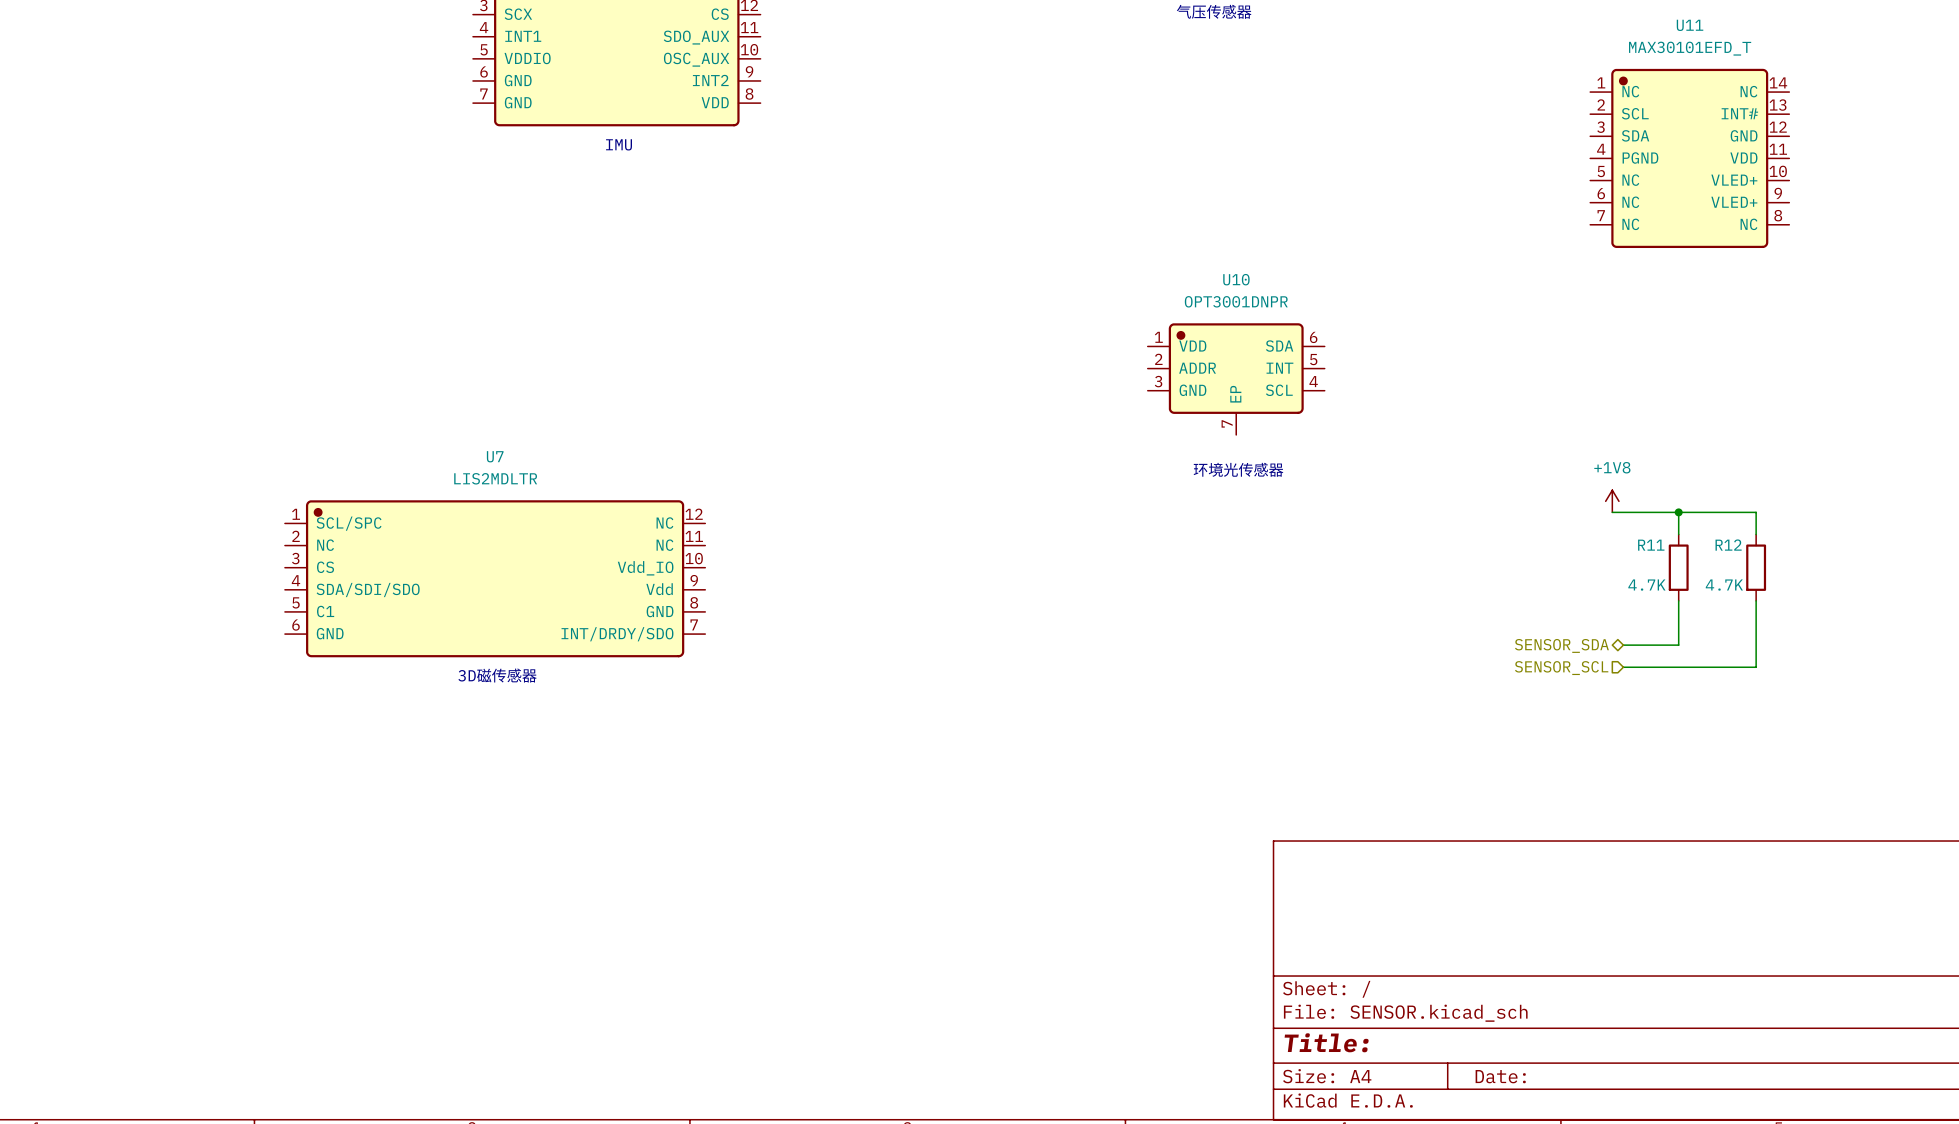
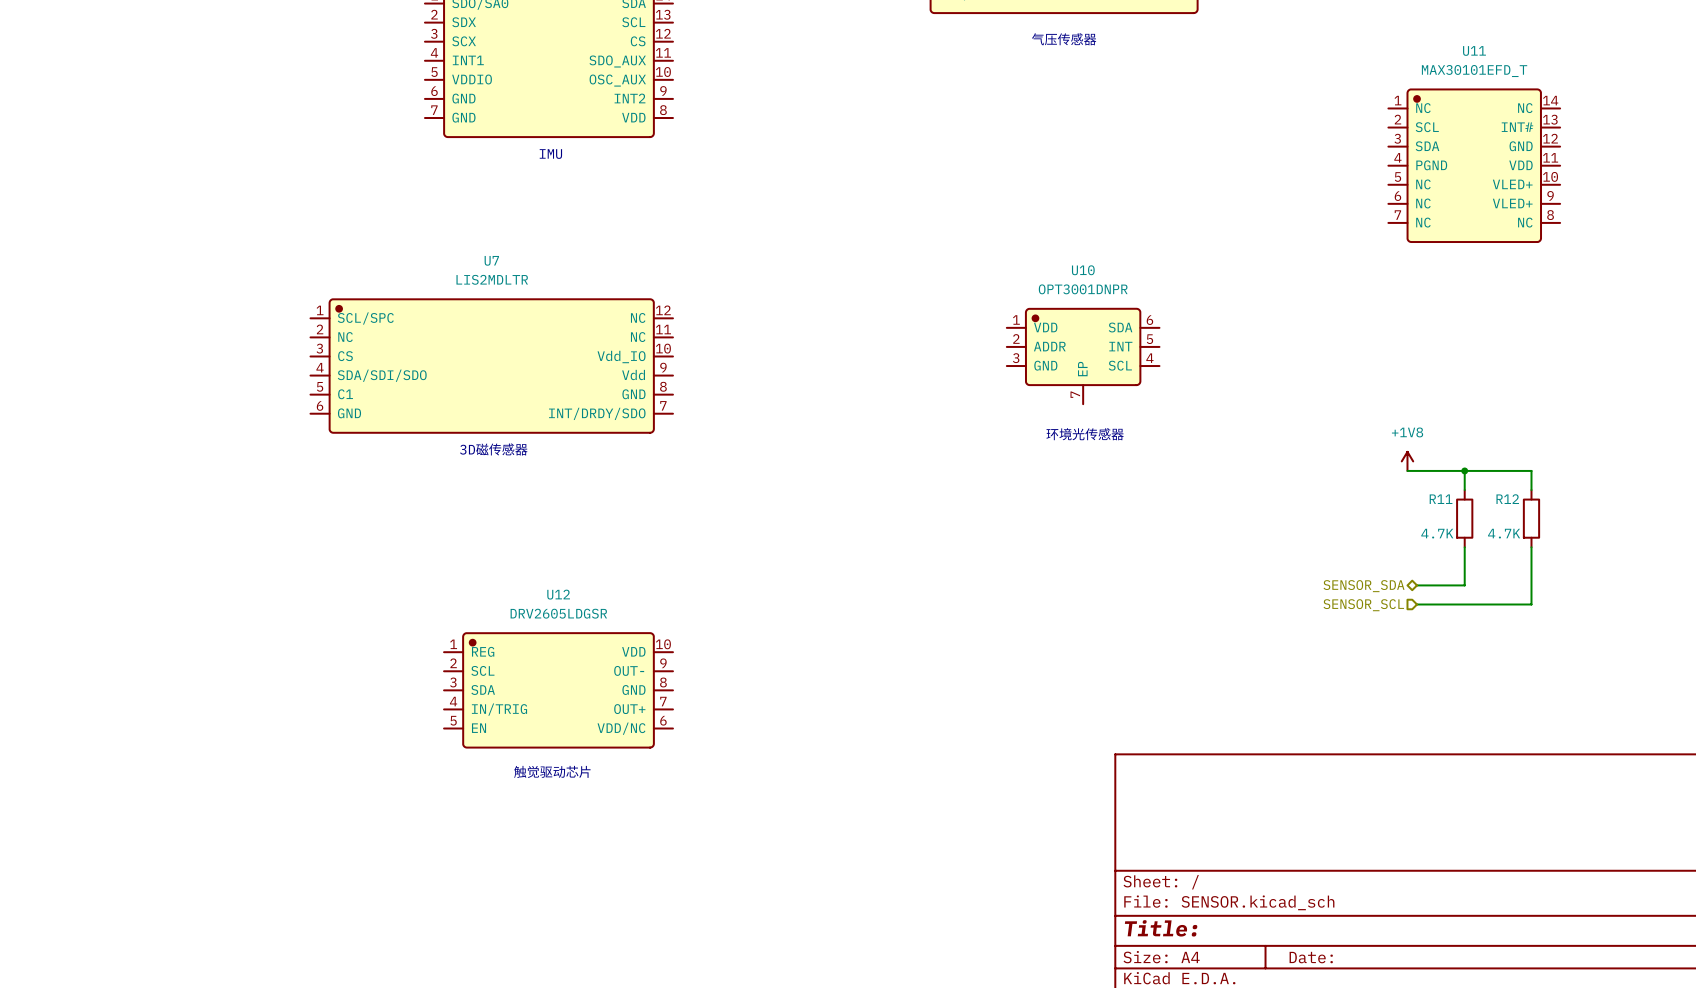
U7 position: (495, 578) -> (491, 366)
text position: 3D磁传感器 (497, 675) -> 3D磁传感器 (493, 449)
U12: none -> DRV2605LDGSR (558, 690)
text: none -> 触觉驱动芯片 (552, 771)

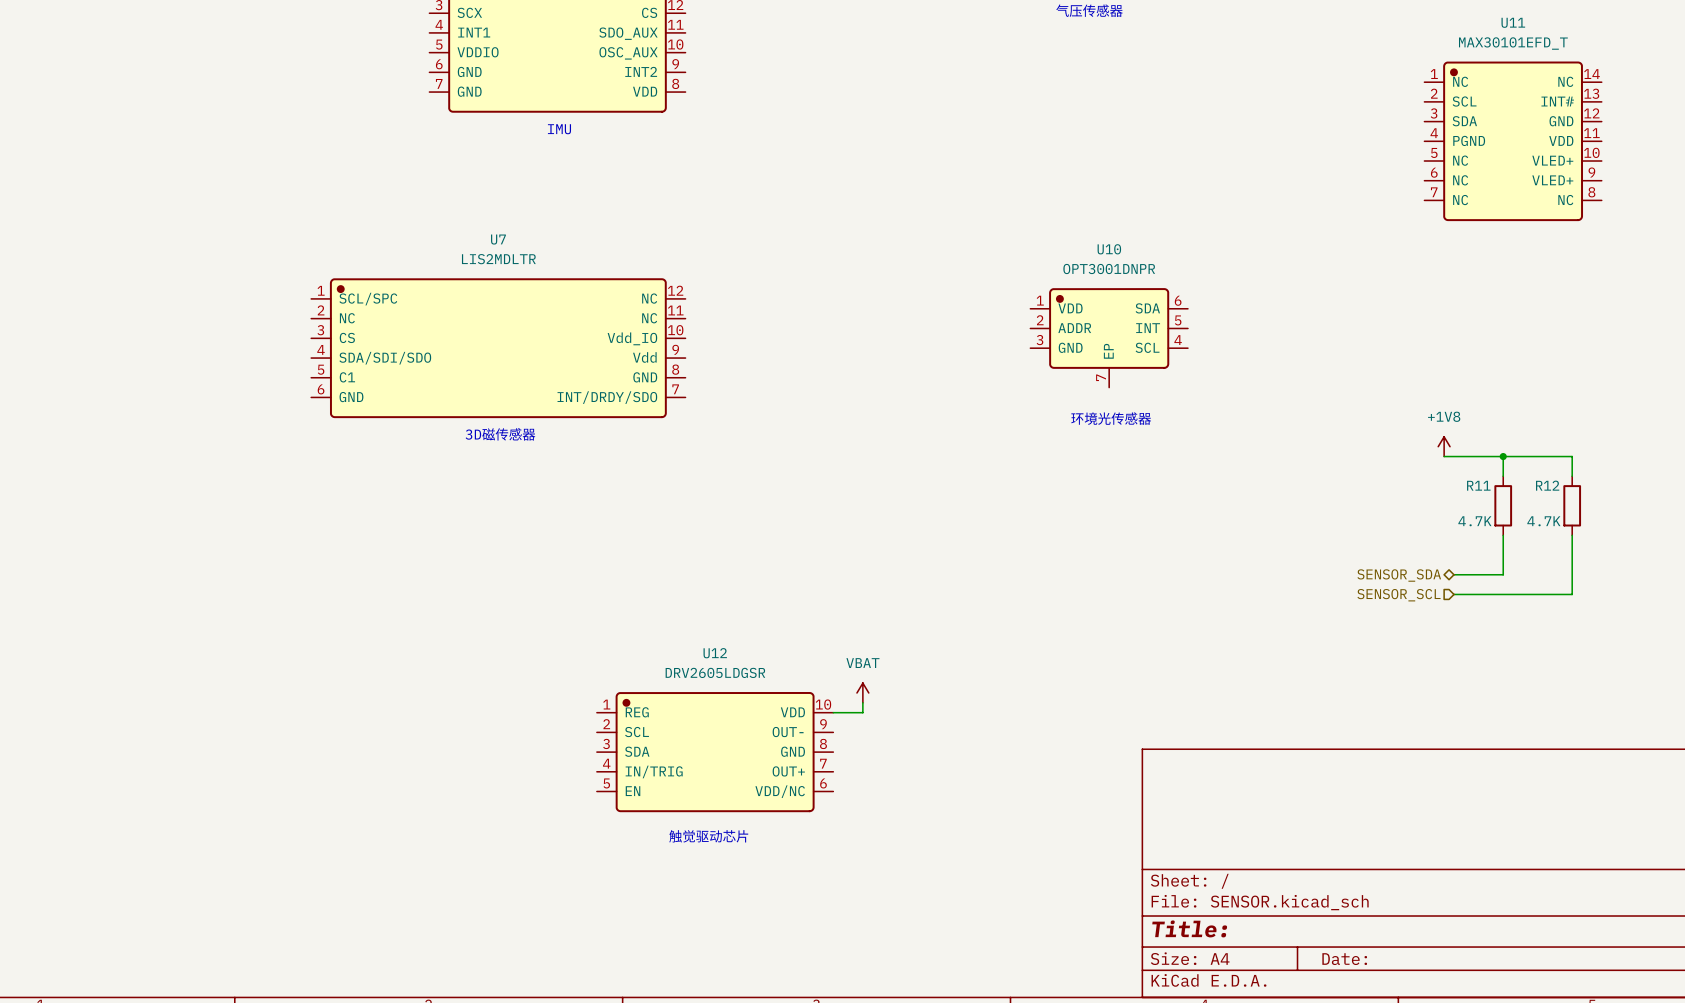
U12 position: (558, 690) -> (715, 752)
power symbol: none -> VBAT (862, 692)
wire: none -> (862, 702) (862, 712) (833, 712)
text position: 触觉驱动芯片 (552, 771) -> 触觉驱动芯片 (708, 836)

